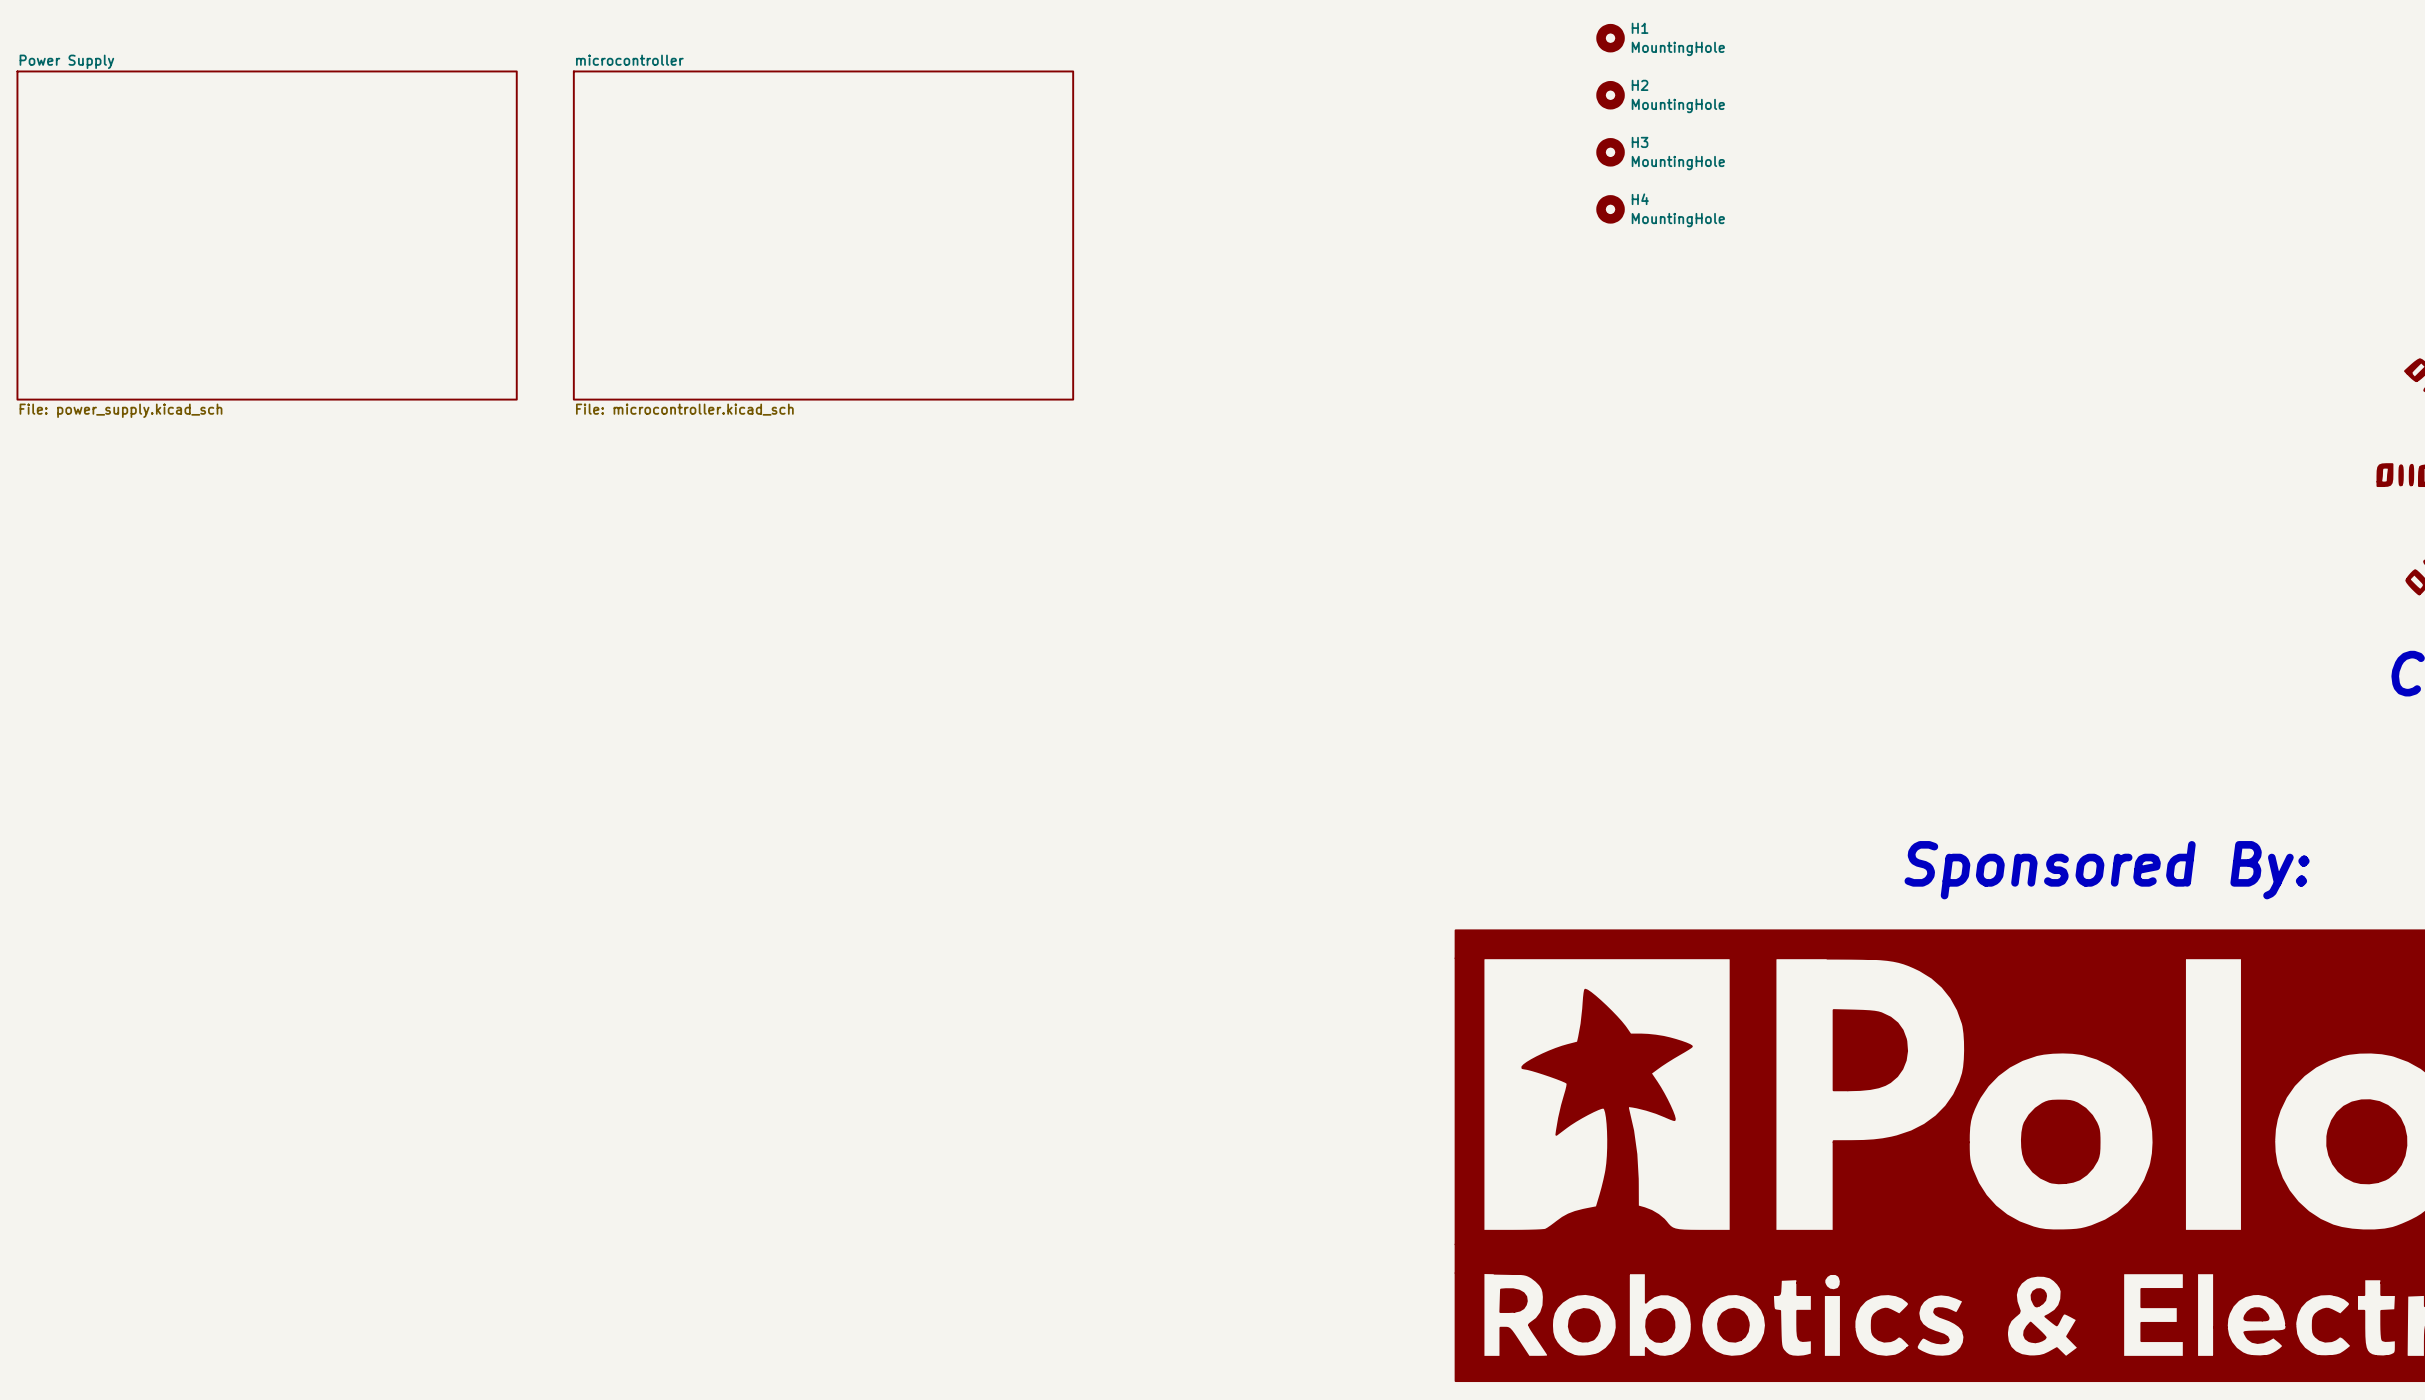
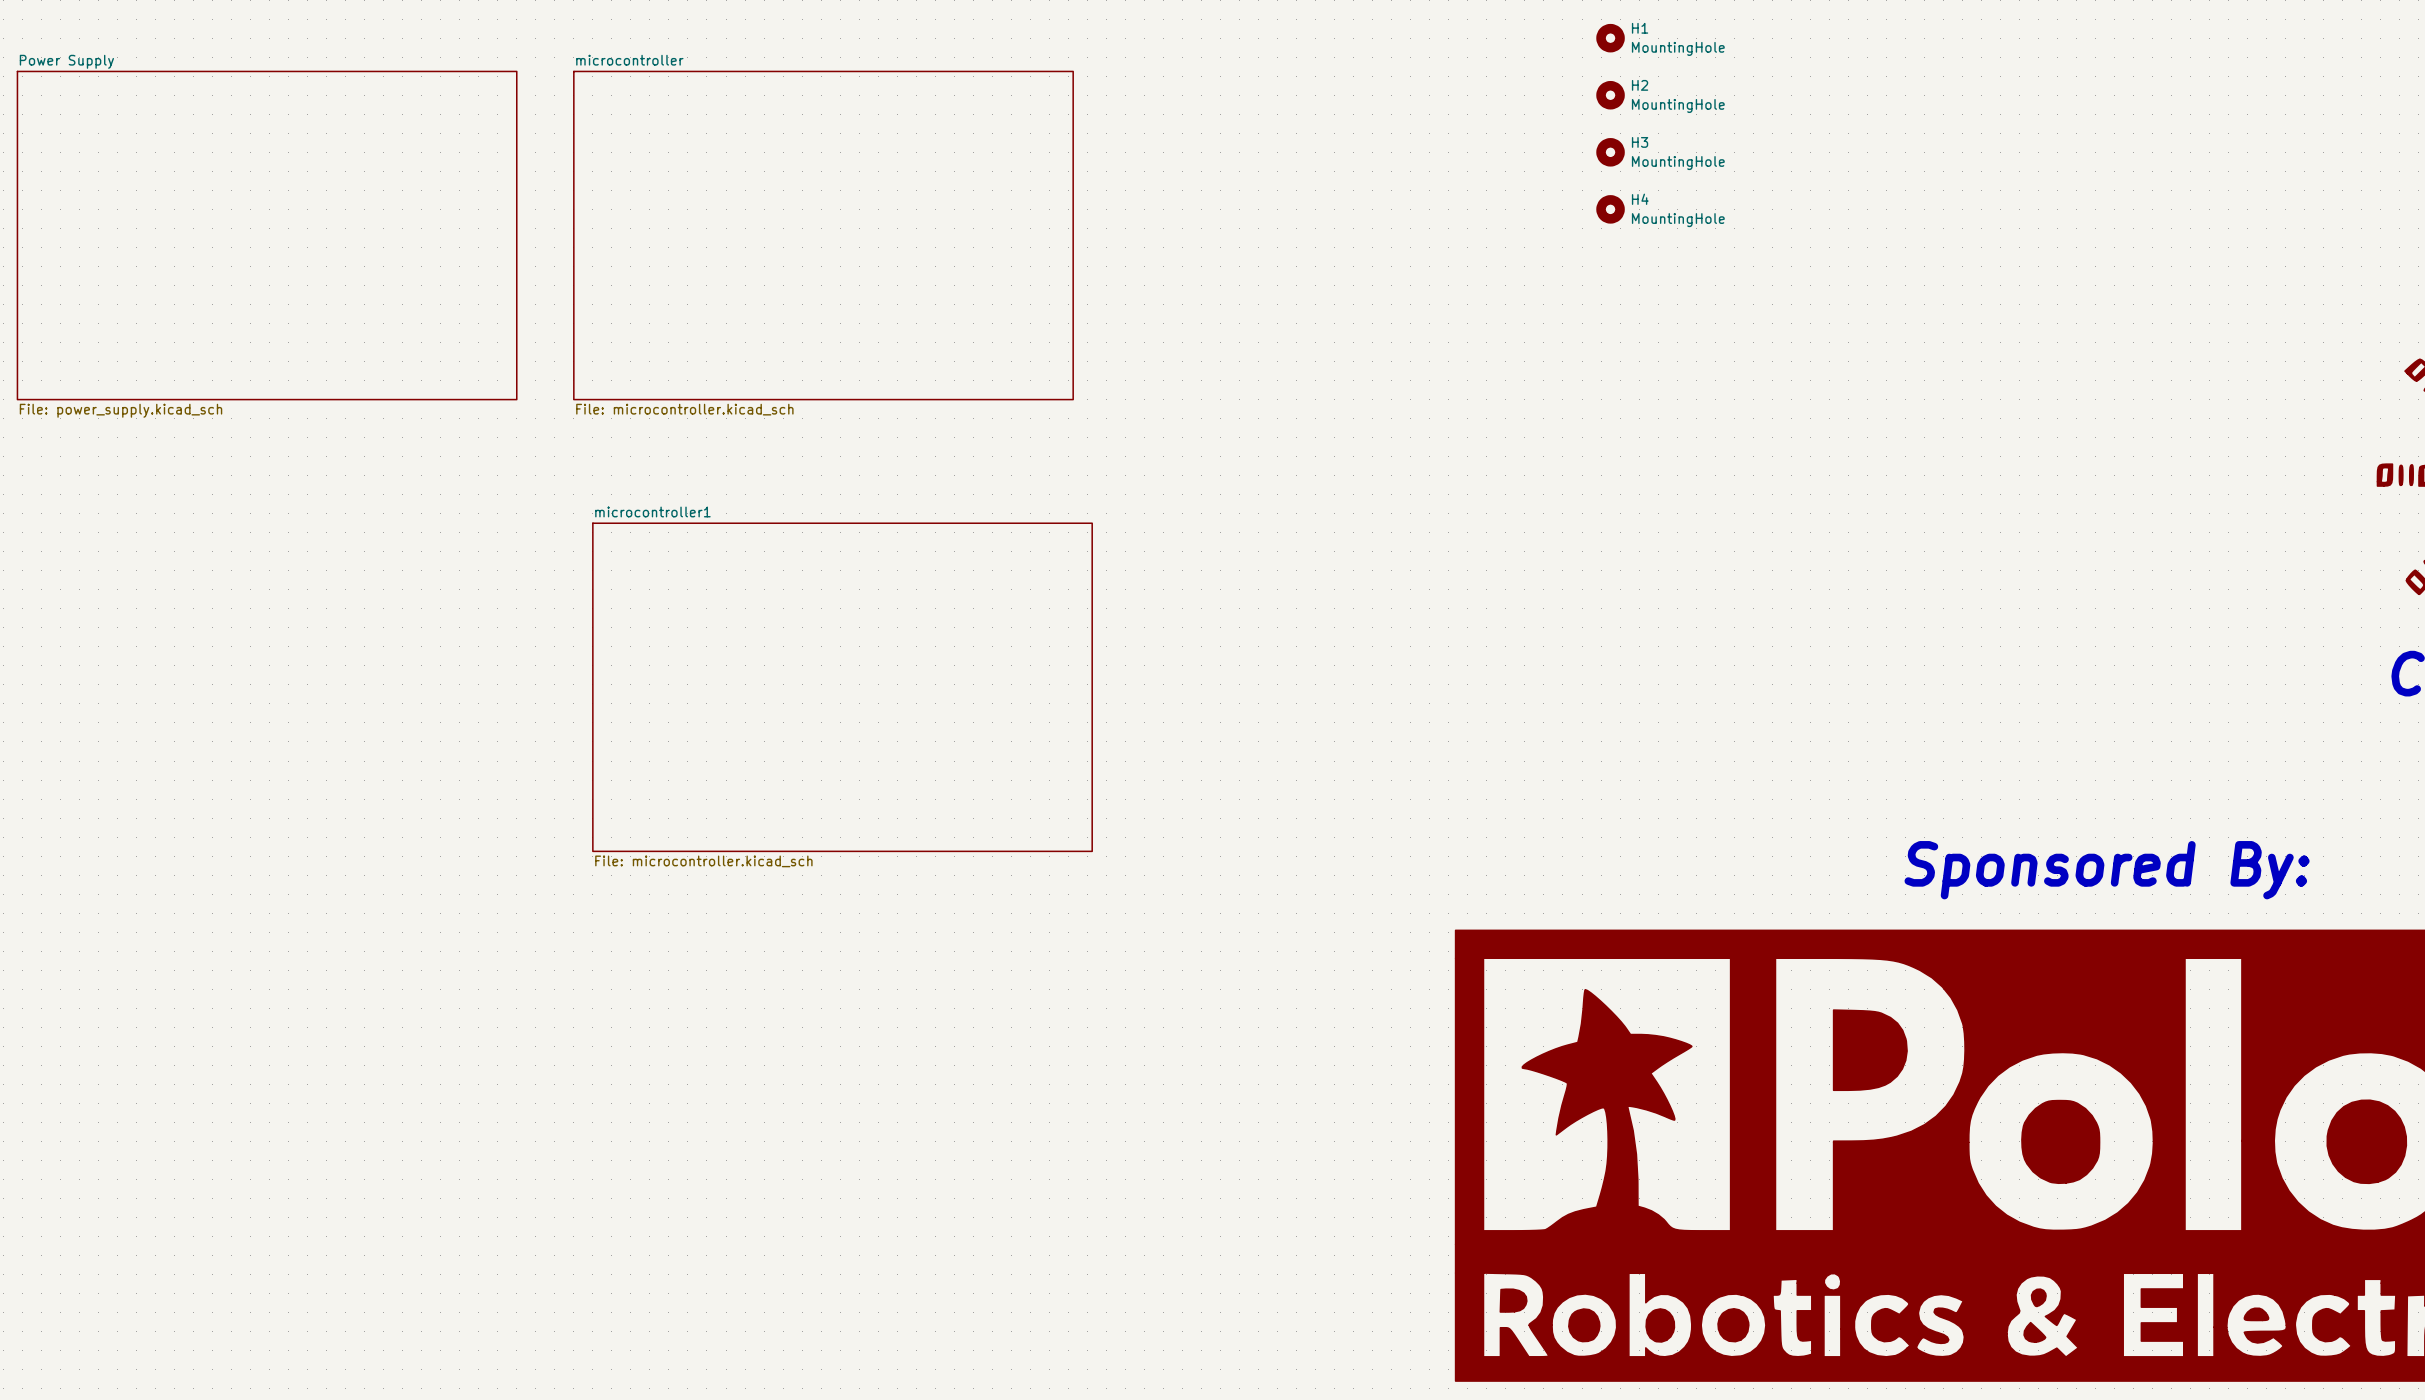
sheet microcontroller1: none -> File: microcontroller.kicad_sch (842, 687)

